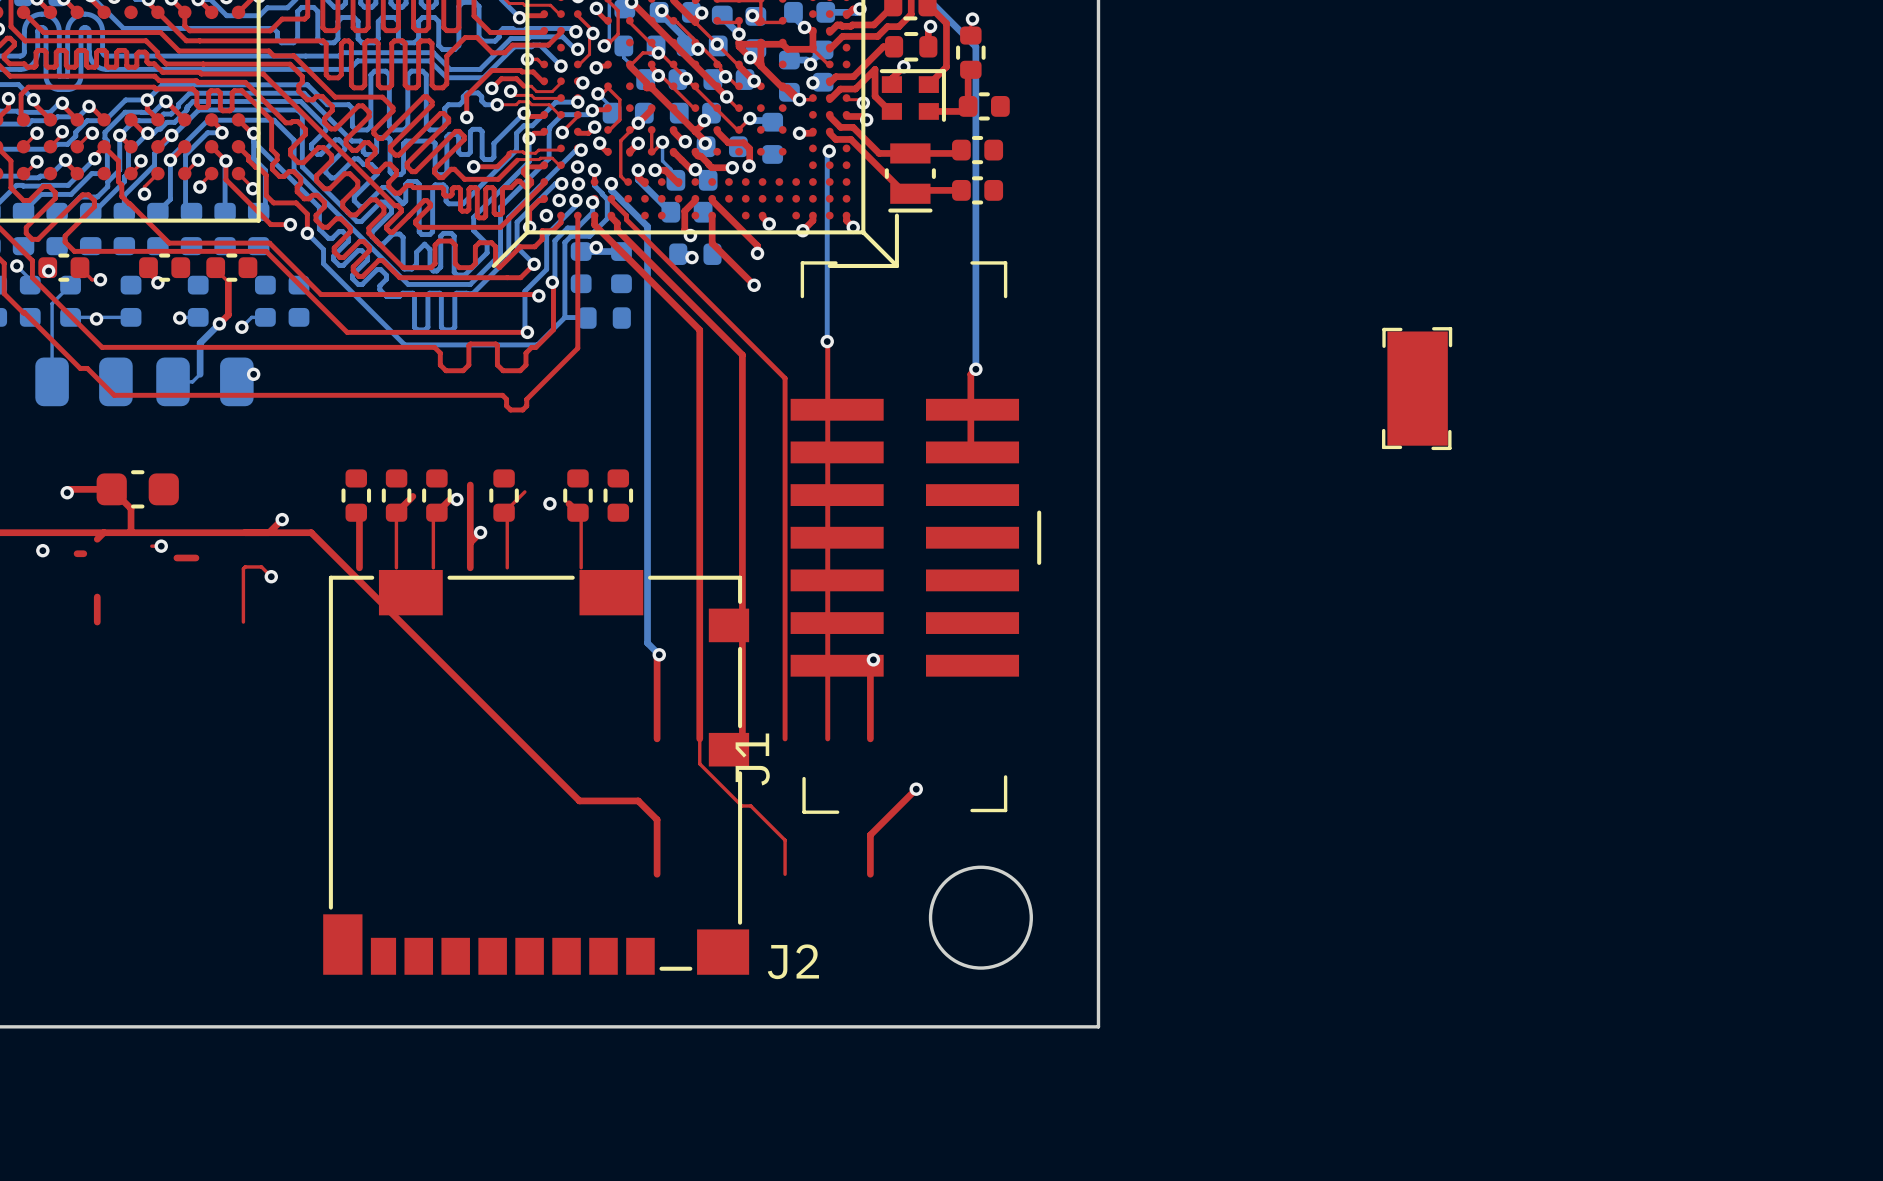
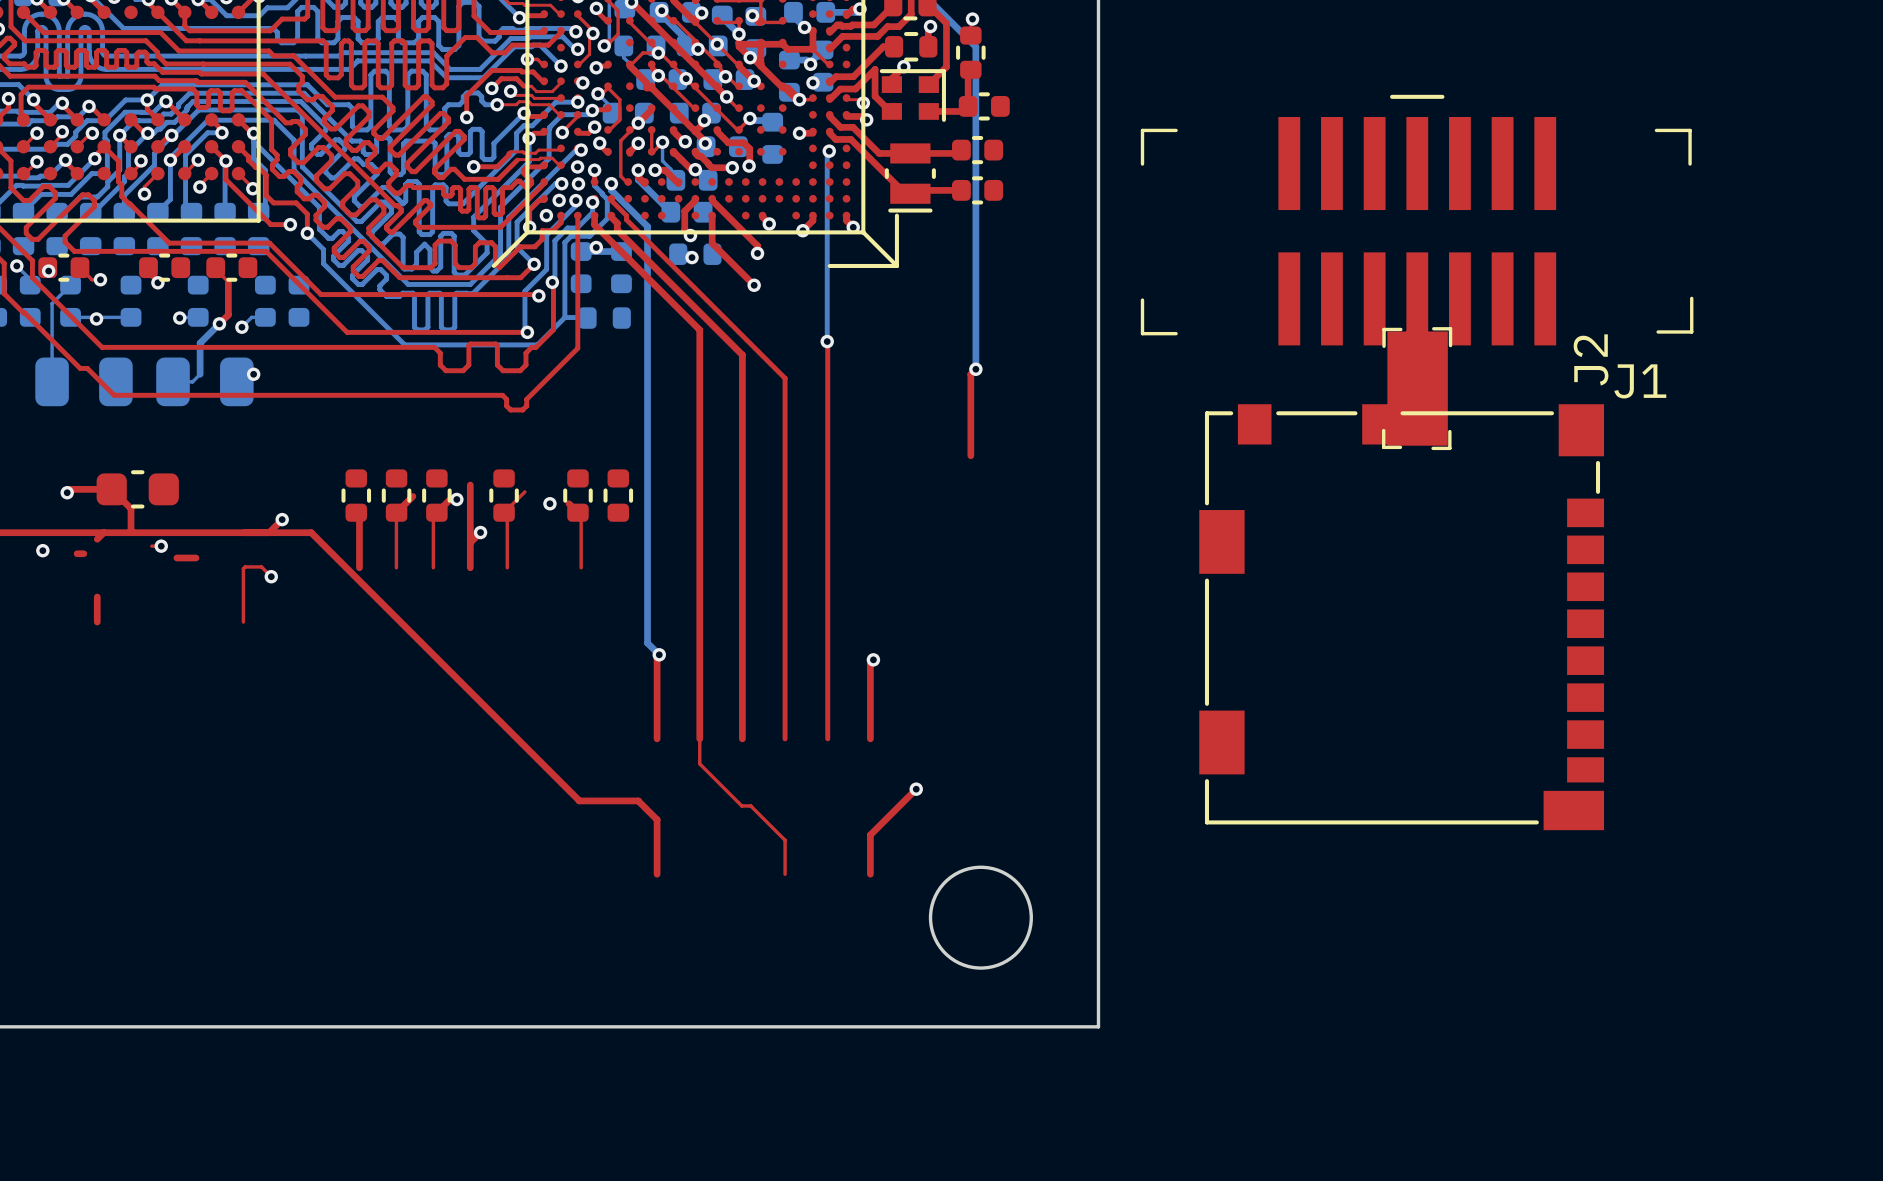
J1 rotation: 0° (915, 537) -> 90° counterclockwise (1417, 220)
J1 position: (915, 537) -> (1417, 220)
J2 rotation: 0° (536, 772) -> 90° counterclockwise (1401, 617)
J2 position: (536, 772) -> (1401, 617)

